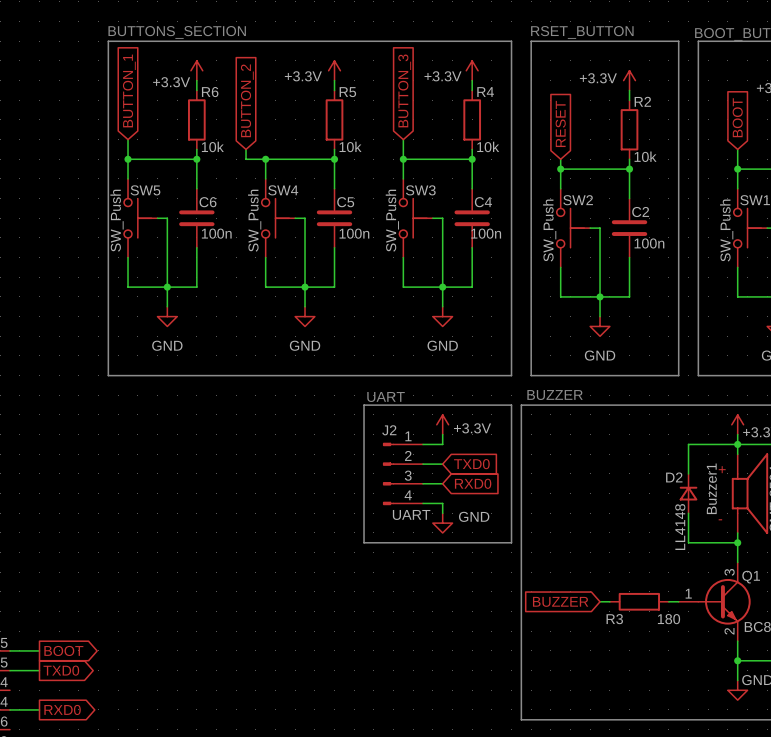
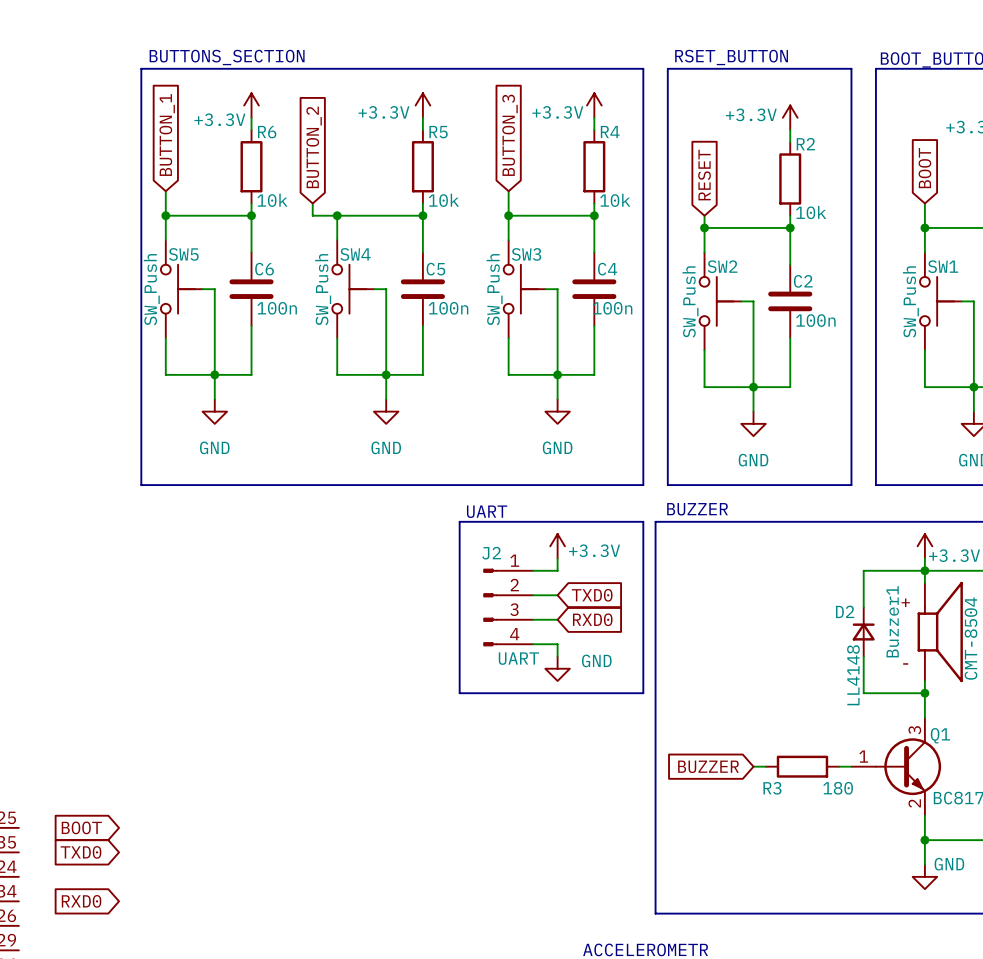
wire: (10, 650) (39, 650) -> none
wire: (10, 670) (39, 670) -> none
wire: (10, 709) (39, 709) -> none

